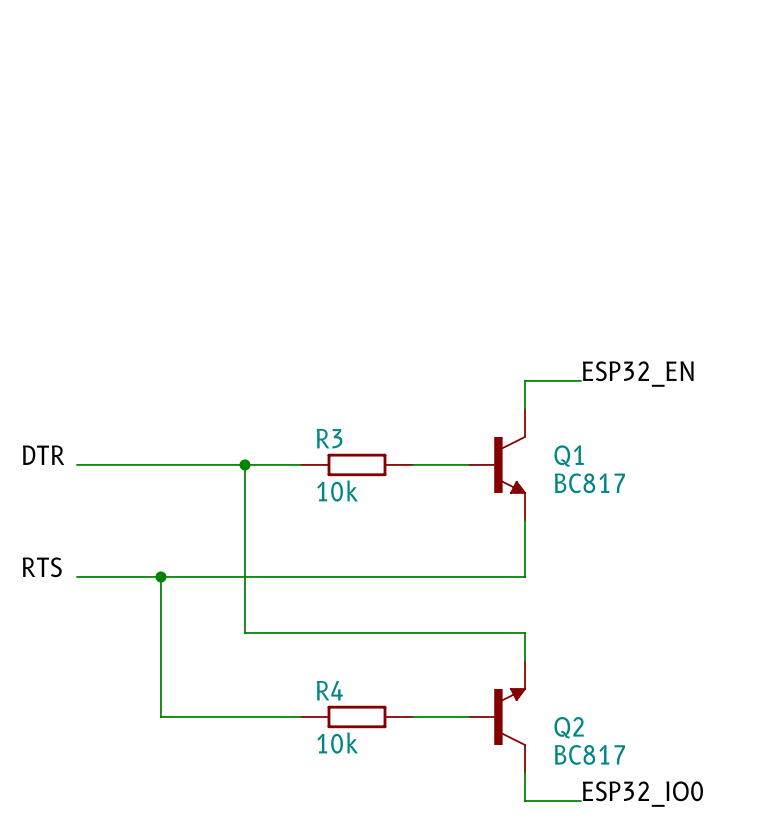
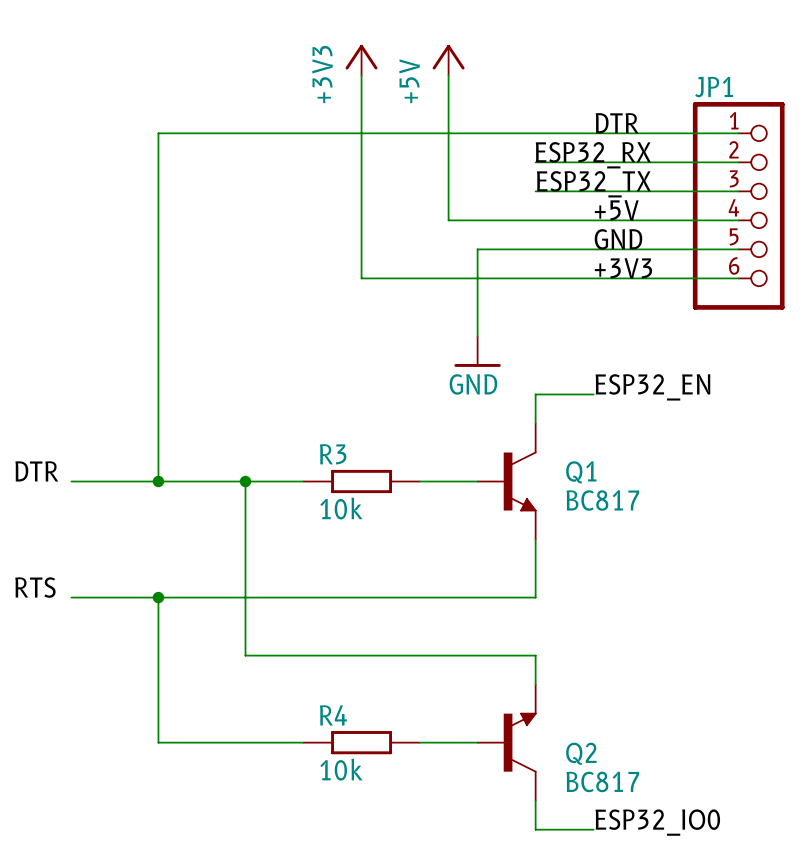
power symbol: none -> +3V3 (361, 60)
power symbol: none -> +5V (448, 60)
wire: none -> (361, 75) (361, 278) (738, 278)
wire: none -> (448, 75) (448, 220) (738, 220)
label: none -> DTR (617, 123)
wire: none -> (738, 133) (158, 133) (158, 481)
label: none -> ESP32_RX (593, 155)
wire: none -> (535, 162) (738, 162)
label: none -> ESP32_TX (593, 184)
wire: none -> (535, 191) (738, 191)
JP1: none -> (738, 205)
label: none -> +5V (616, 210)
label: none -> GND (618, 239)
wire: none -> (738, 249) (477, 249) (477, 336)
label: none -> +3V3 (623, 268)
power symbol: none -> GND (477, 351)
junction: none -> (158, 481)

